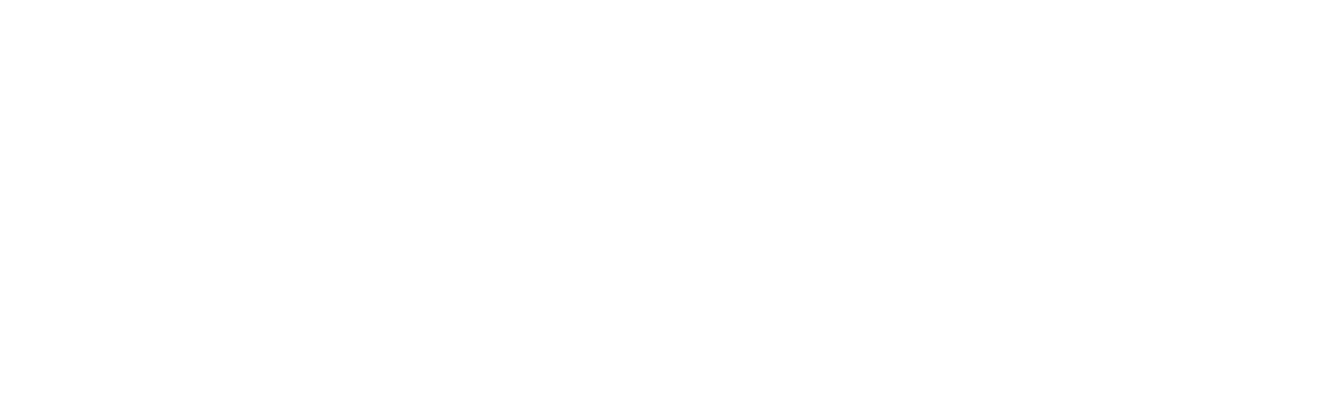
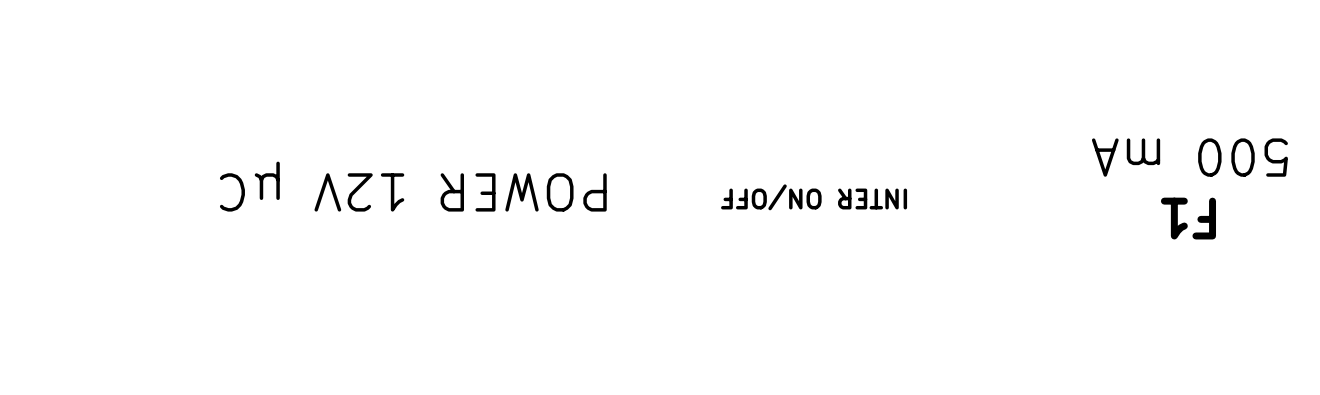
text: none -> 500 mA (1189, 157)
text: none -> POWER 12V µC (413, 186)
text: none -> INTER ON/OFF (814, 197)
text: none -> F1 (1188, 218)

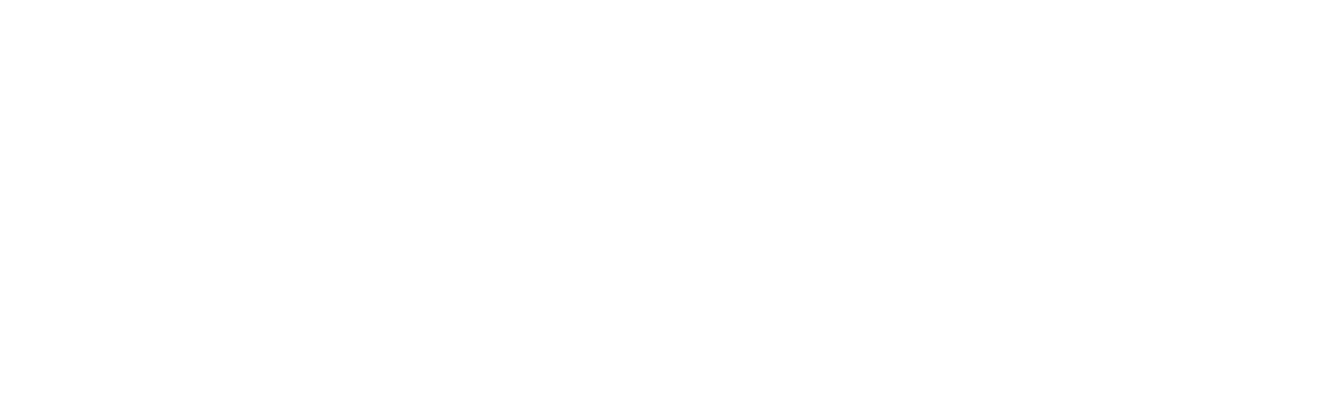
text: 500 mA (1189, 157) -> none
text: POWER 12V µC (413, 186) -> none
text: INTER ON/OFF (814, 197) -> none
text: F1 (1188, 218) -> none

